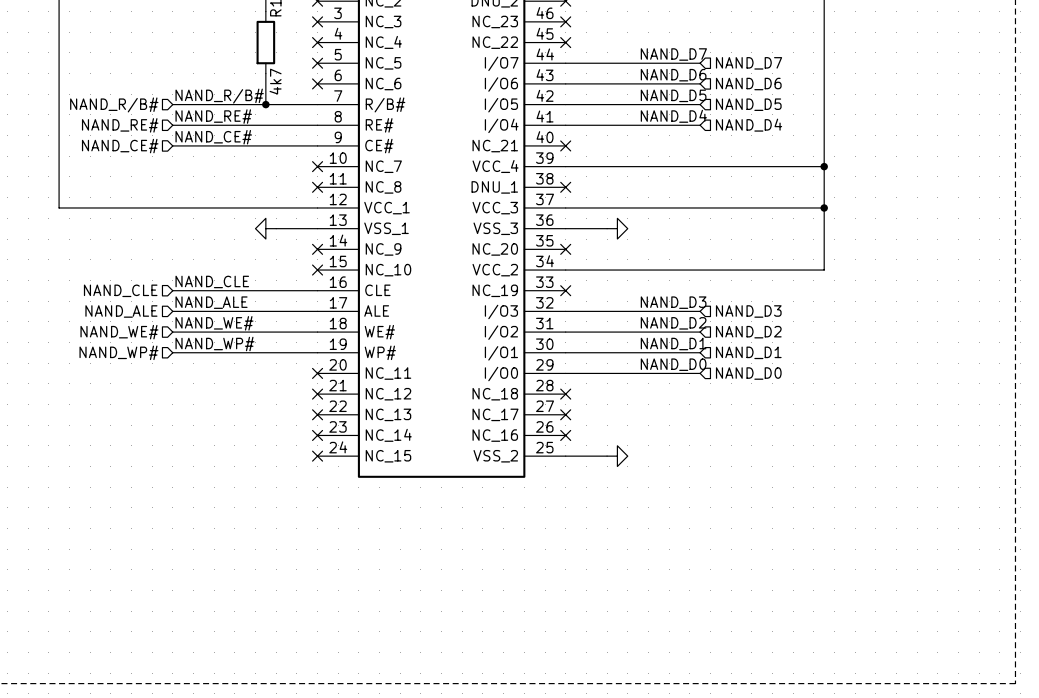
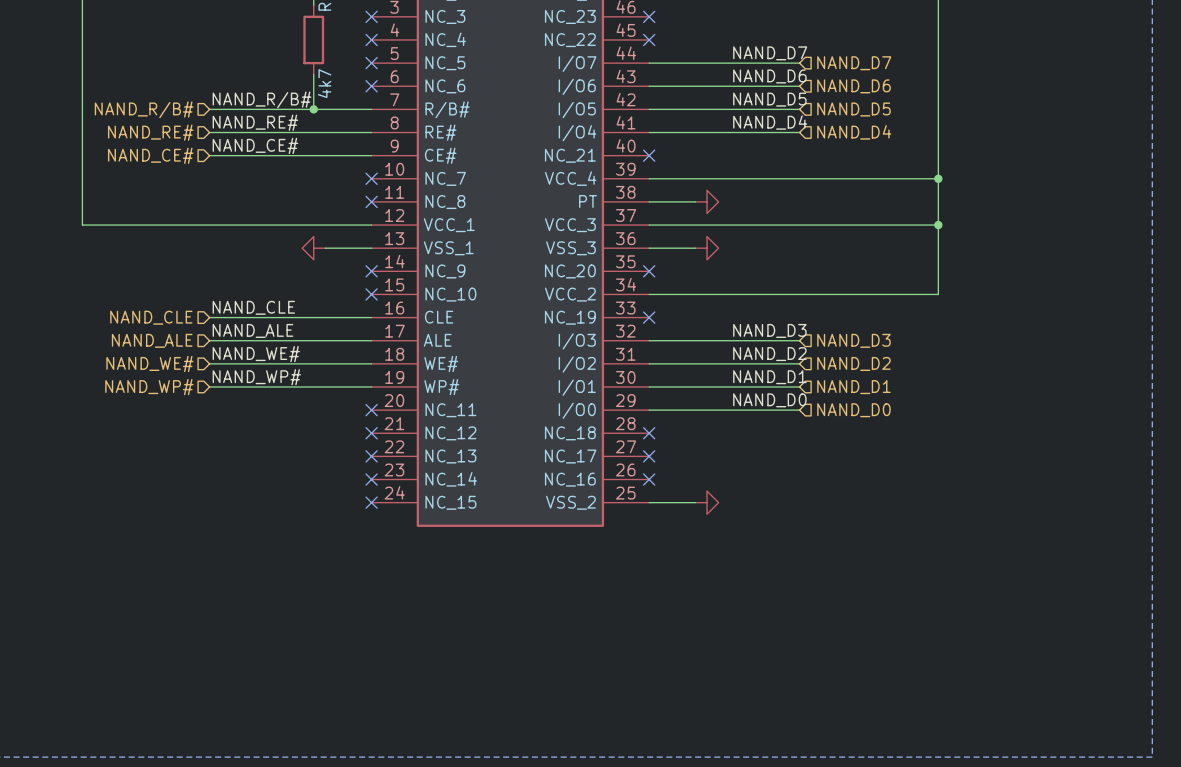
part pin name: DNU_1 (494, 187) -> PT (588, 201)
wire: none -> (649, 201) (695, 201)
no-connect mark: (565, 187) -> none
power symbol: none -> (707, 201)

